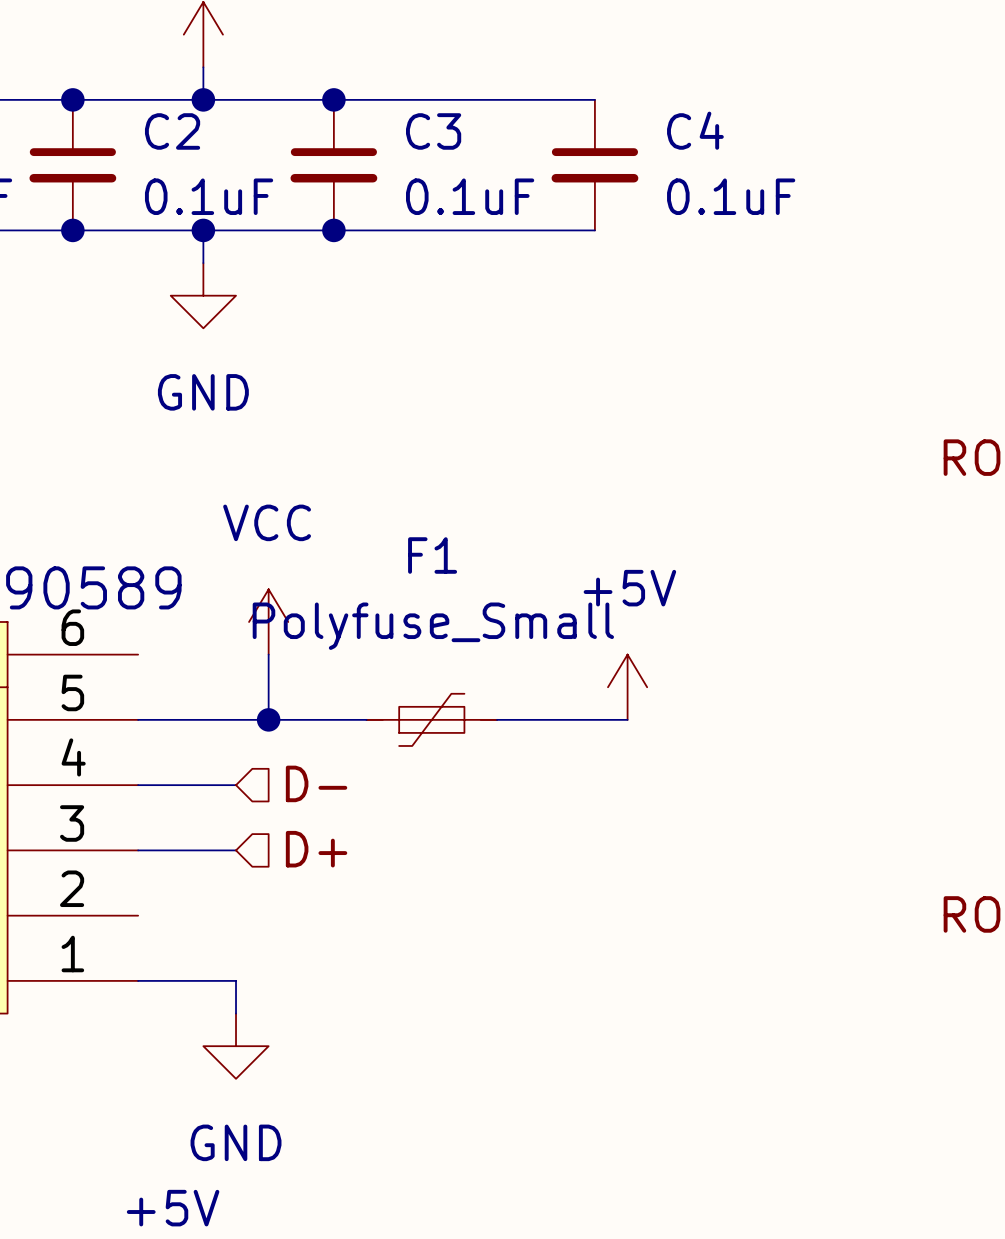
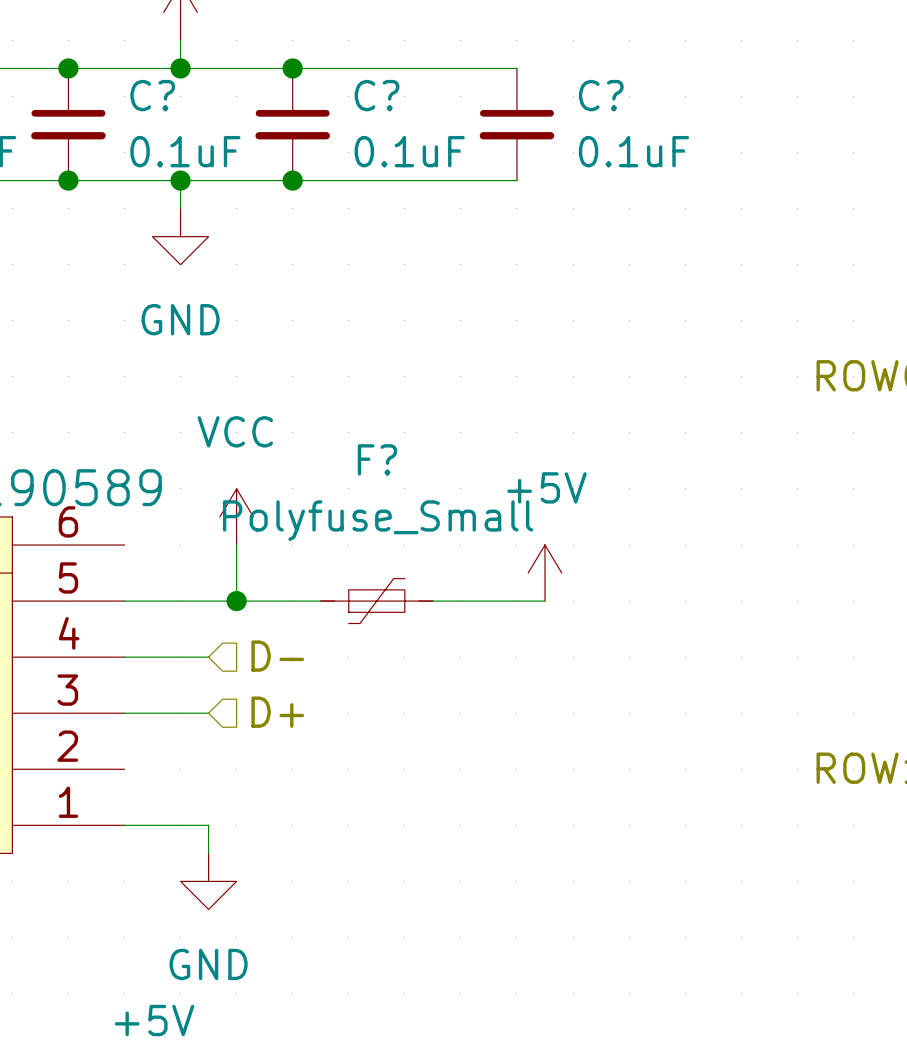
C4 name: C4 (695, 130) -> C? (601, 95)
C2 name: C2 (172, 131) -> C? (152, 95)
C3 name: C3 (433, 131) -> C? (377, 95)
F1 name: F1 (432, 555) -> F? (377, 459)

